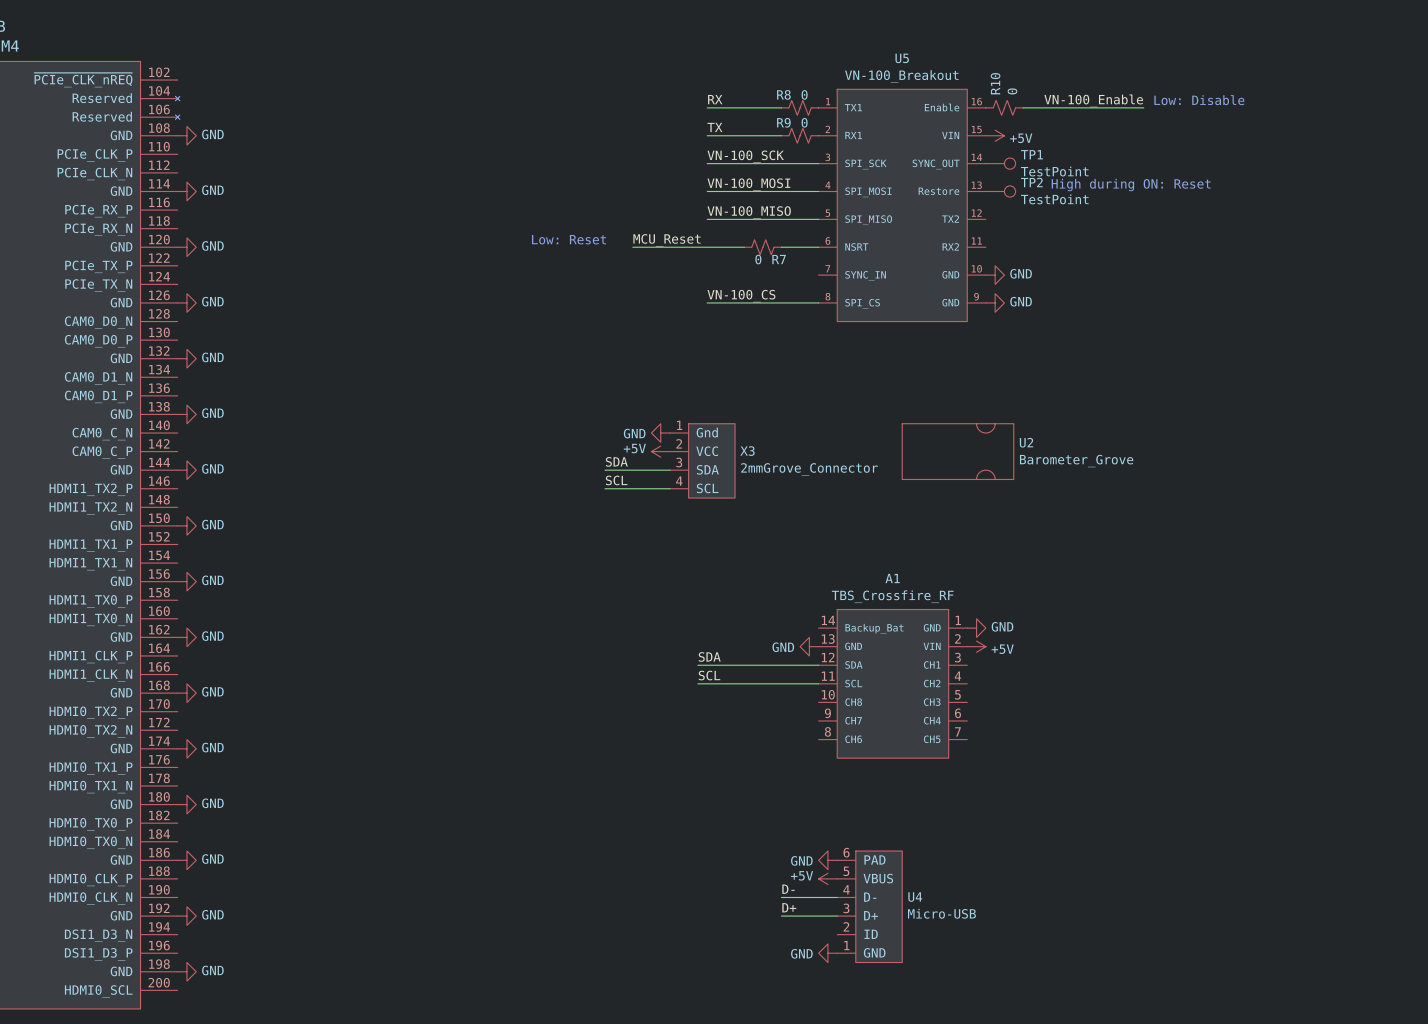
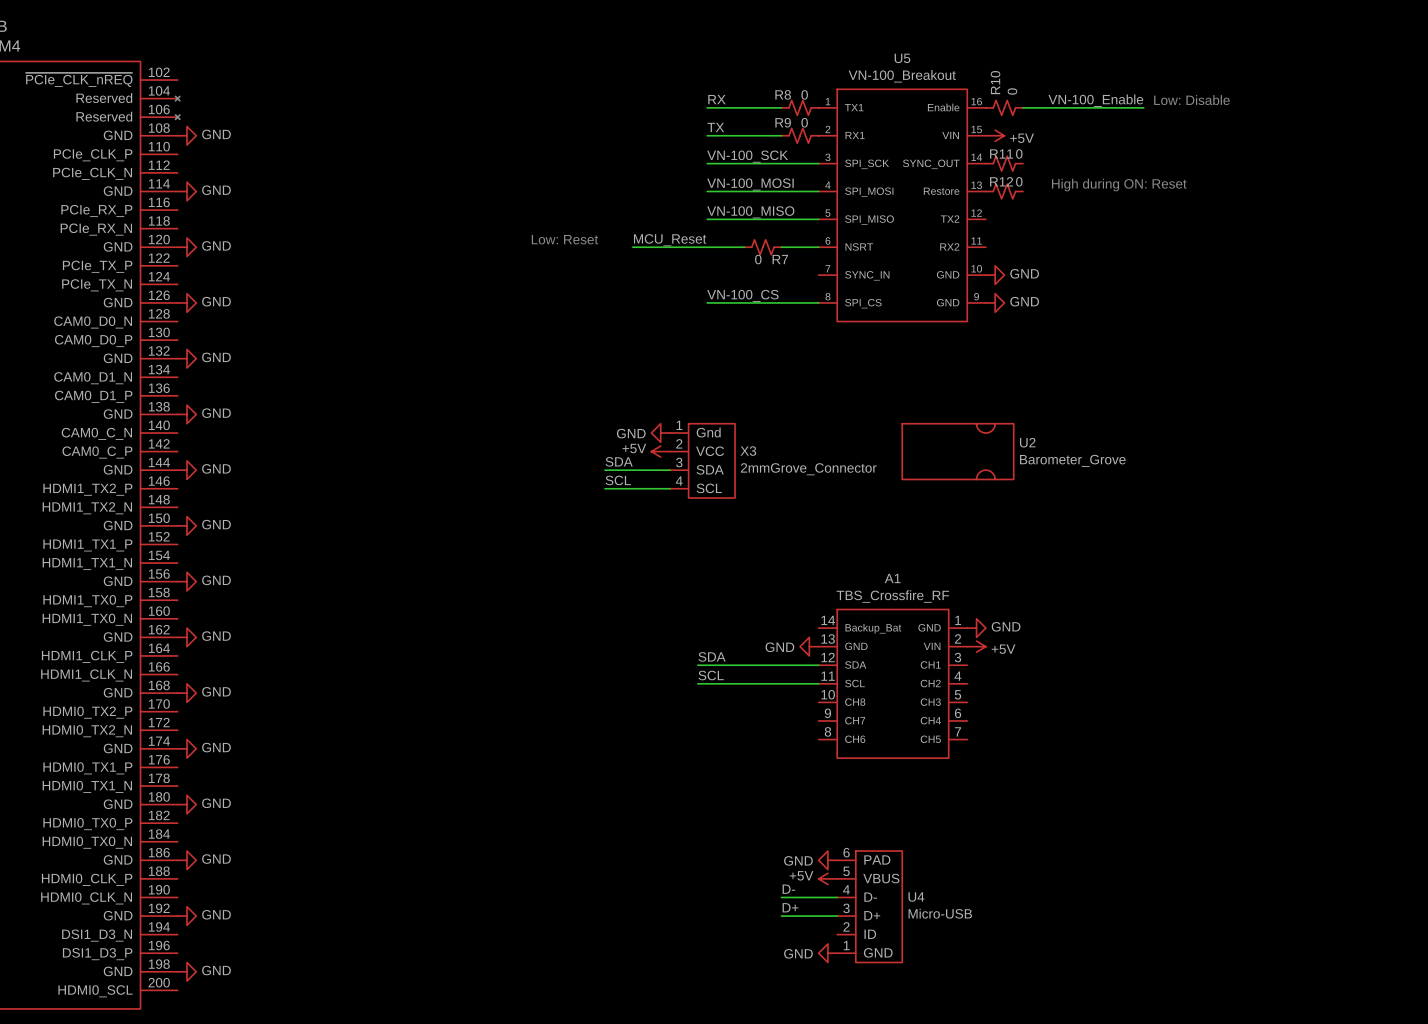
TP1: TestPoint (1000, 163) -> none
R11: none -> 0 (1004, 163)
TP2: TestPoint (1000, 191) -> none
R12: none -> 0 (1004, 191)

